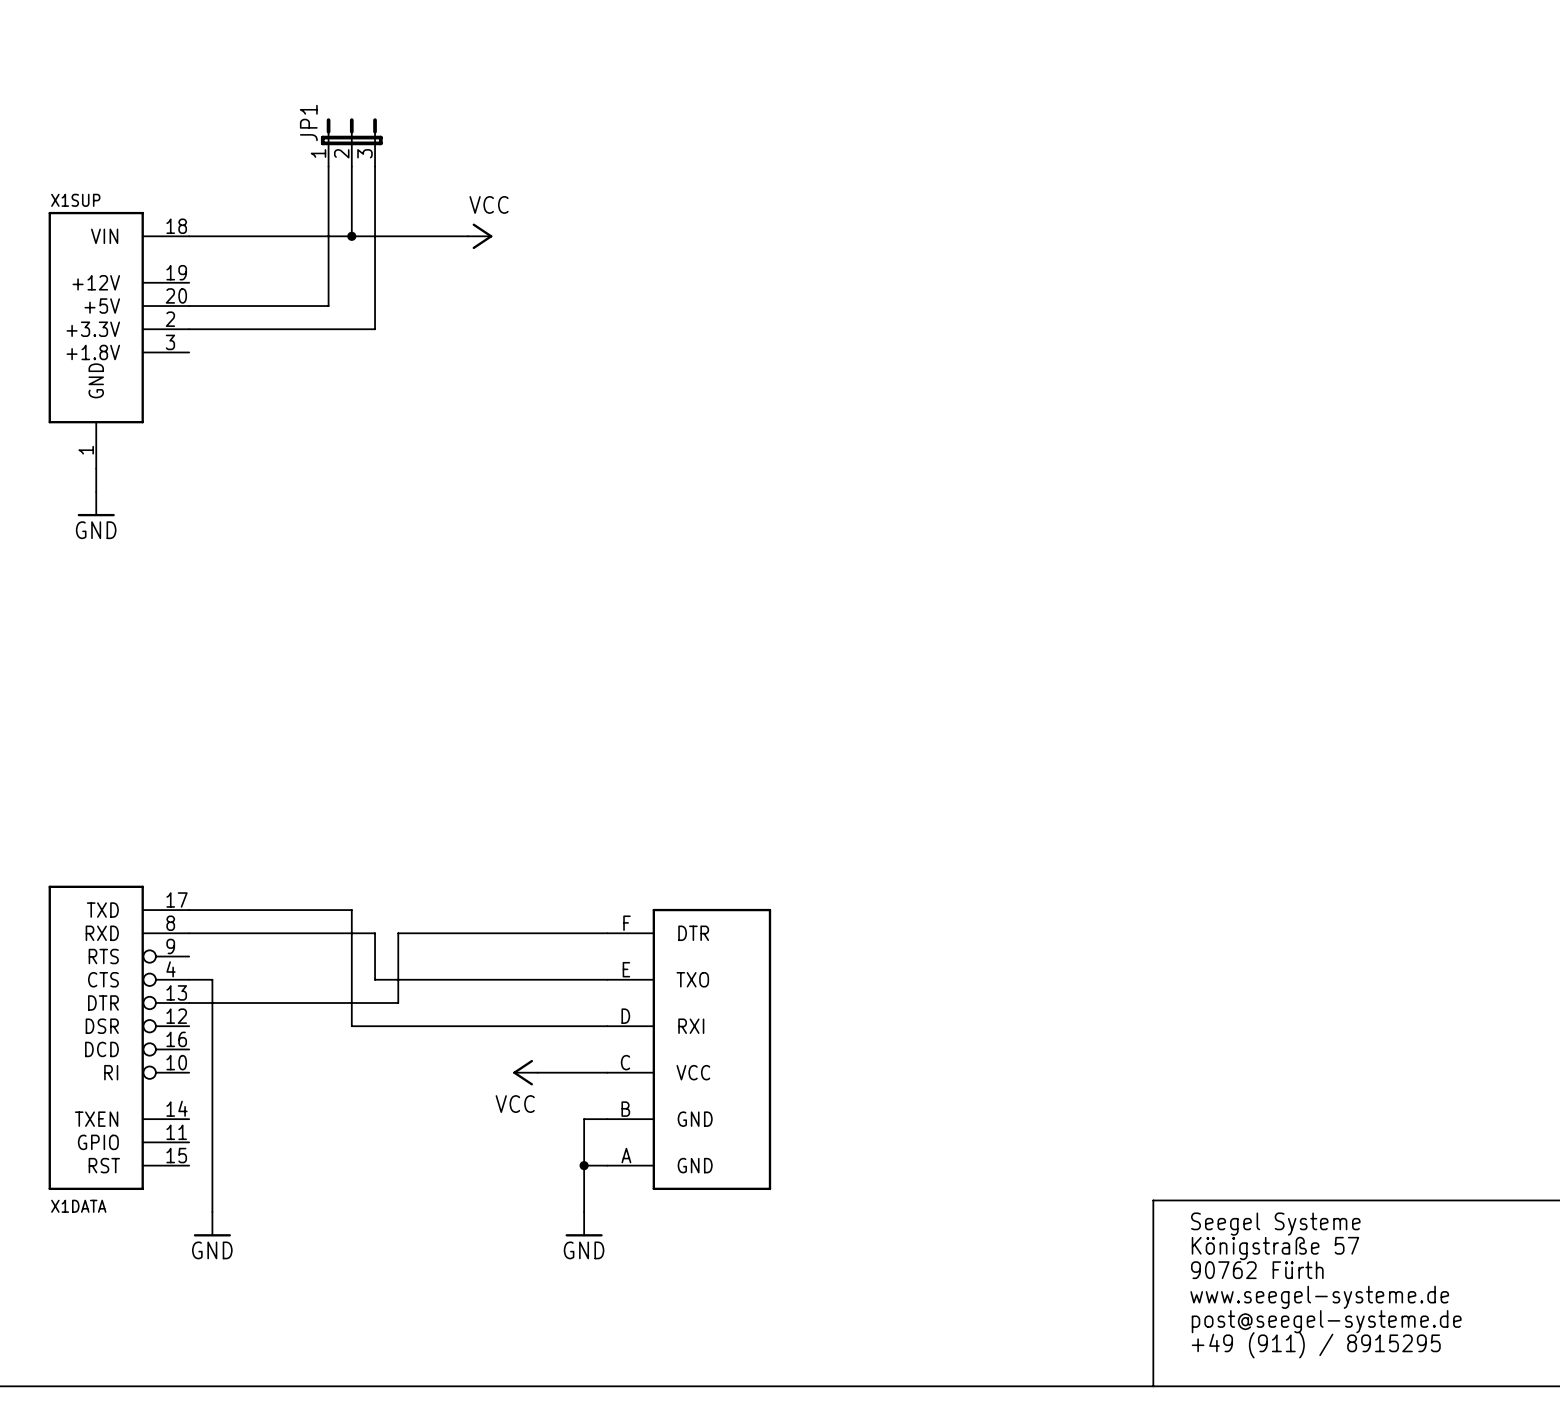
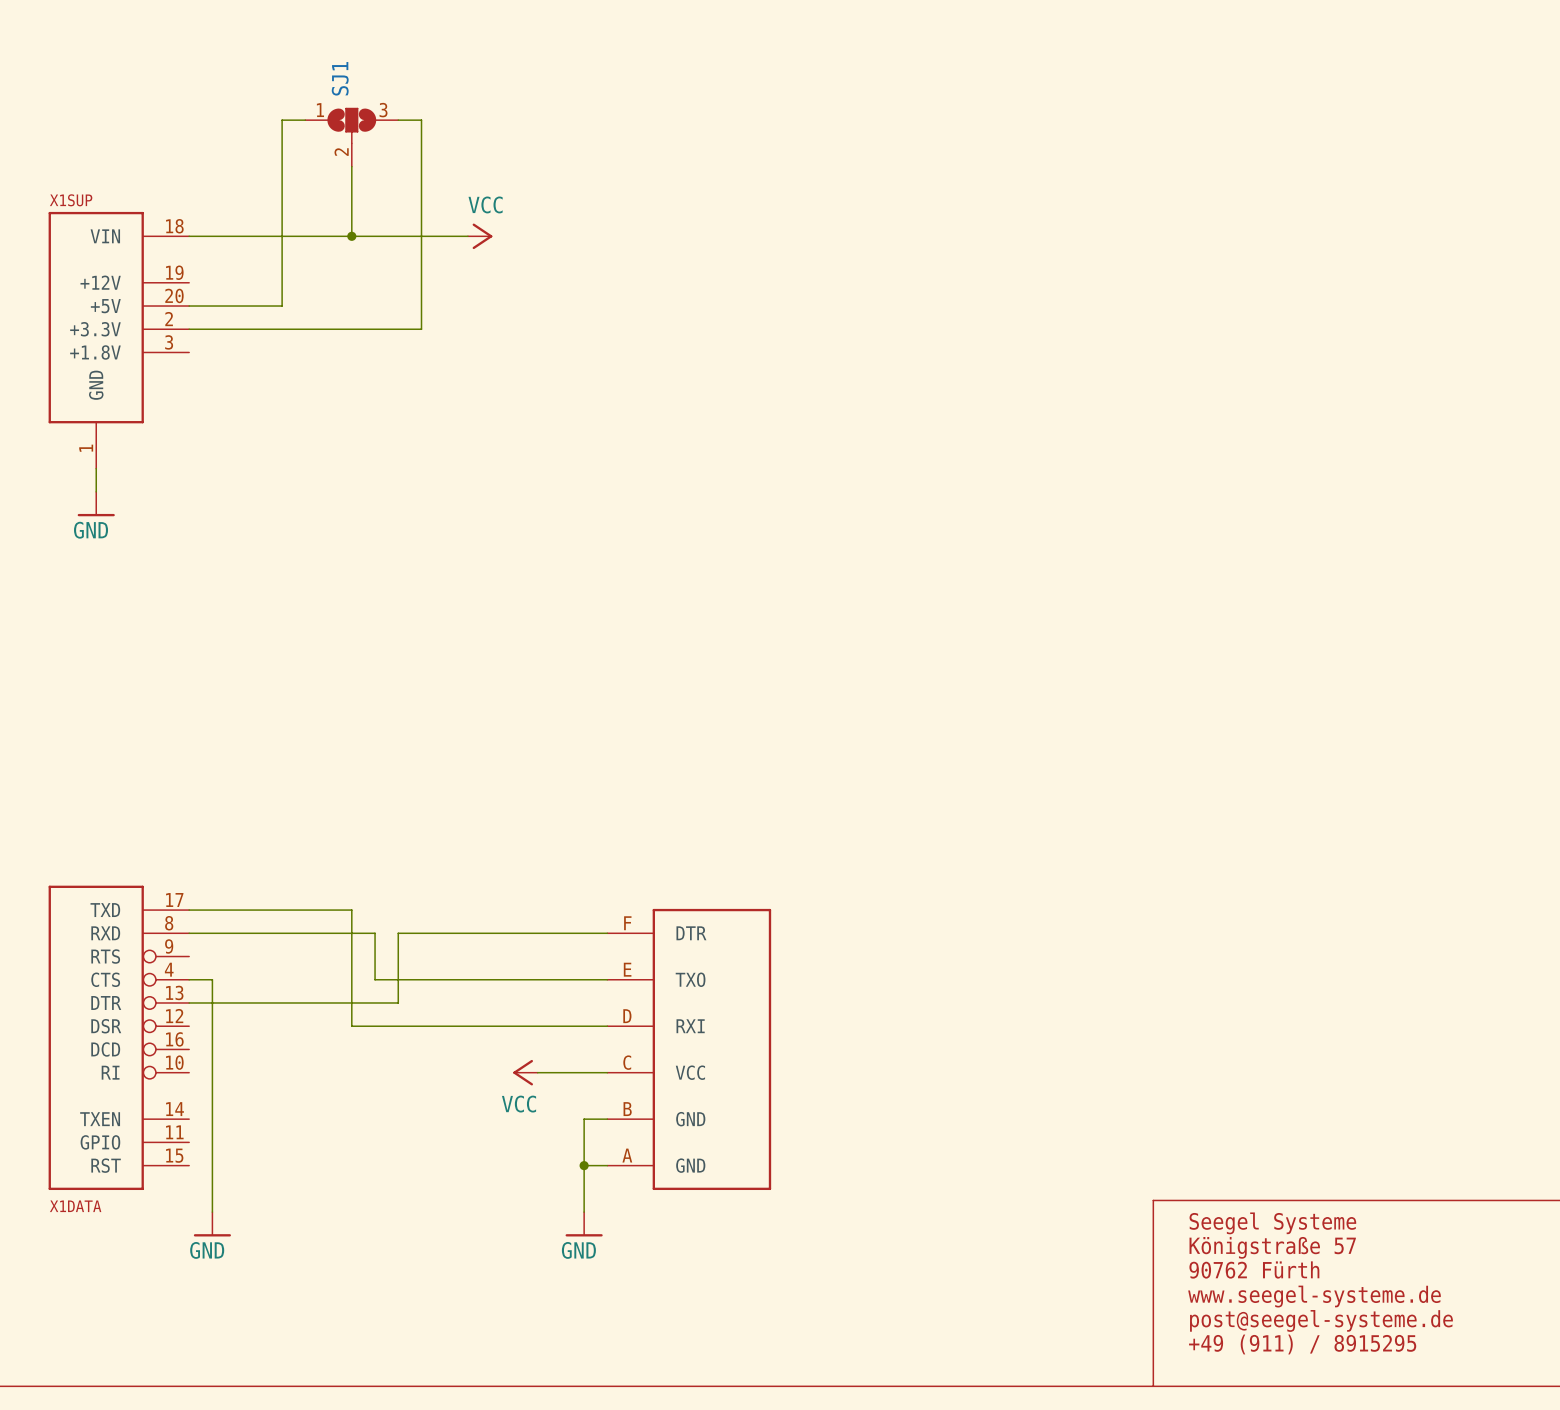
SJ1: none -> (351, 137)
JP1: (351, 142) -> none
wire: (328, 166) (328, 306) (282, 306) -> (305, 120) (282, 120) (282, 306)
wire: (375, 166) (375, 329) -> (398, 120) (421, 120) (421, 329) (375, 329)

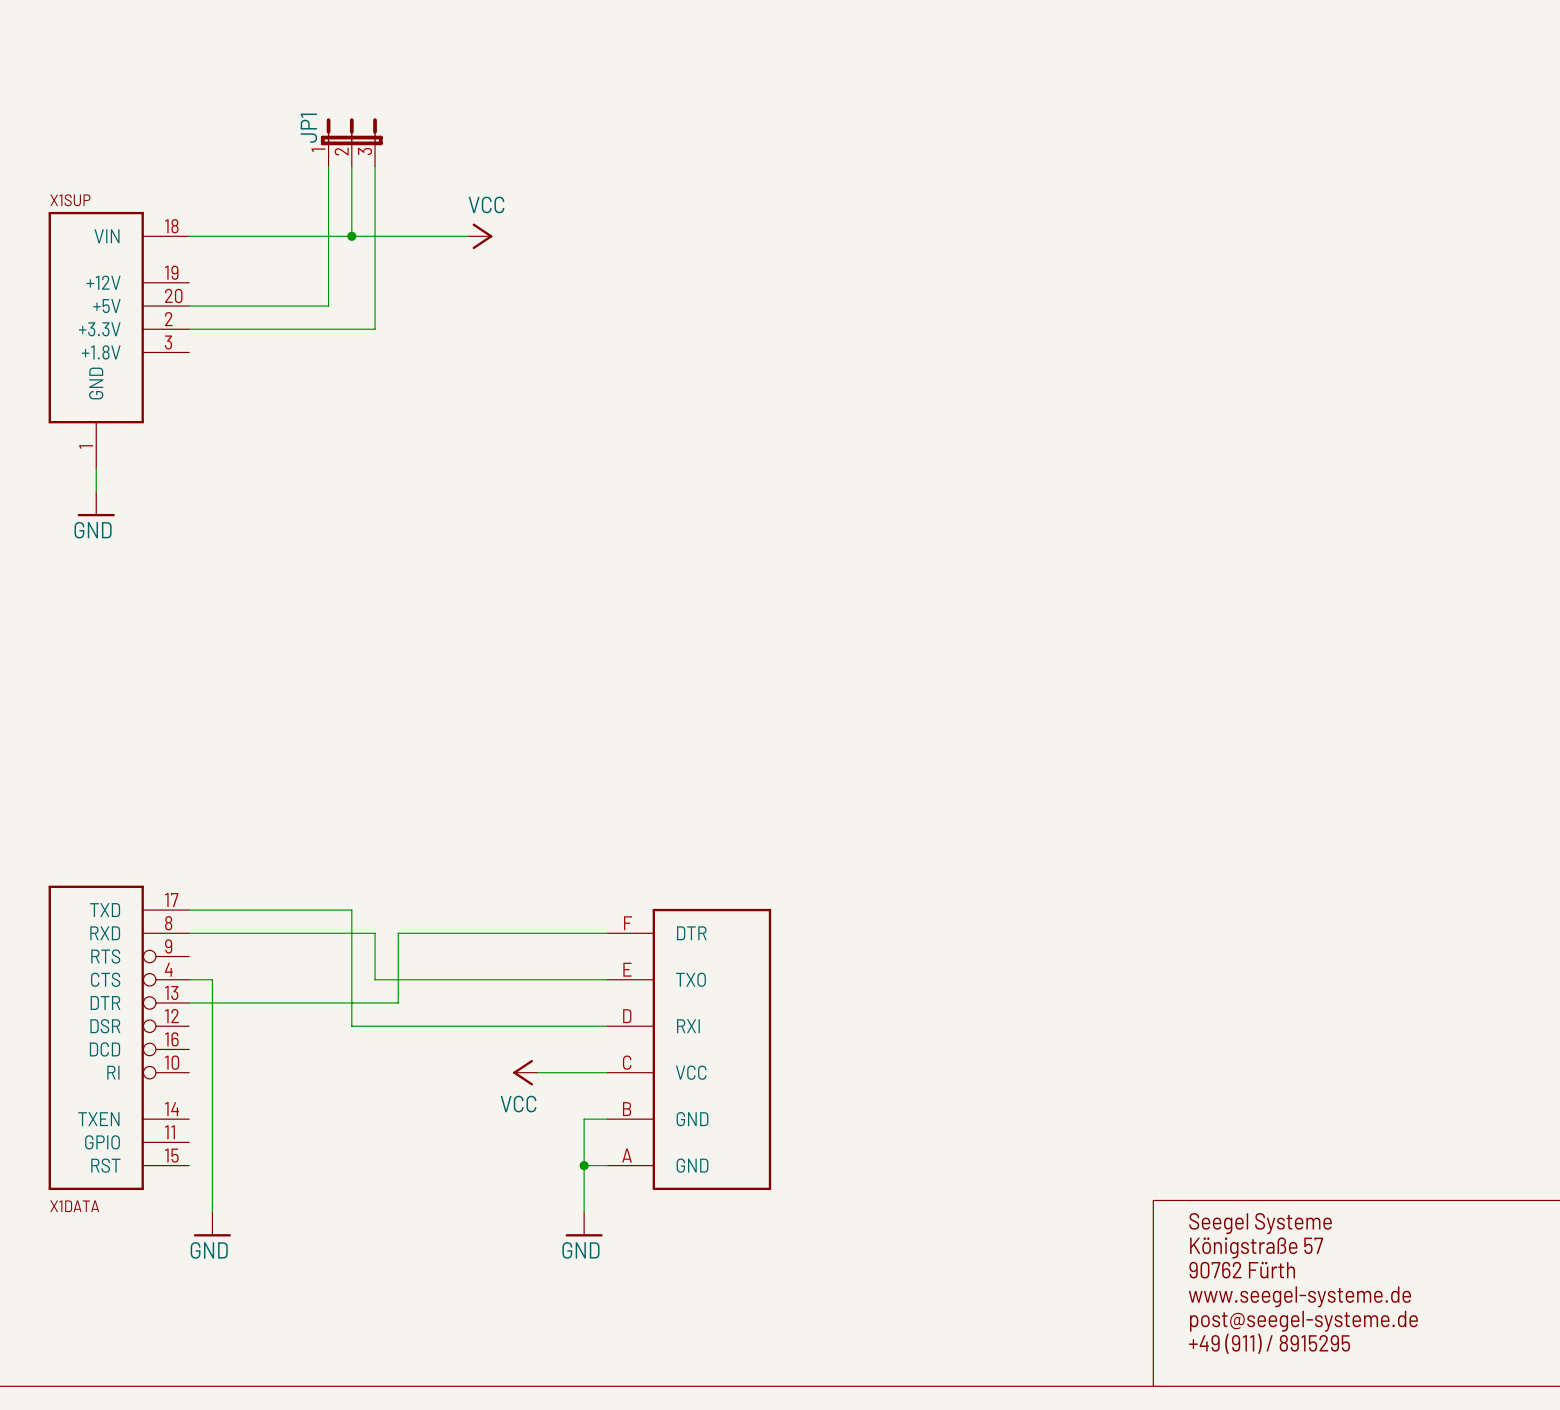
wire: (305, 120) (282, 120) (282, 306) -> (328, 166) (328, 306) (282, 306)
wire: (398, 120) (421, 120) (421, 329) (375, 329) -> (375, 166) (375, 329)
SJ1: (351, 137) -> none
JP1: none -> (351, 142)

